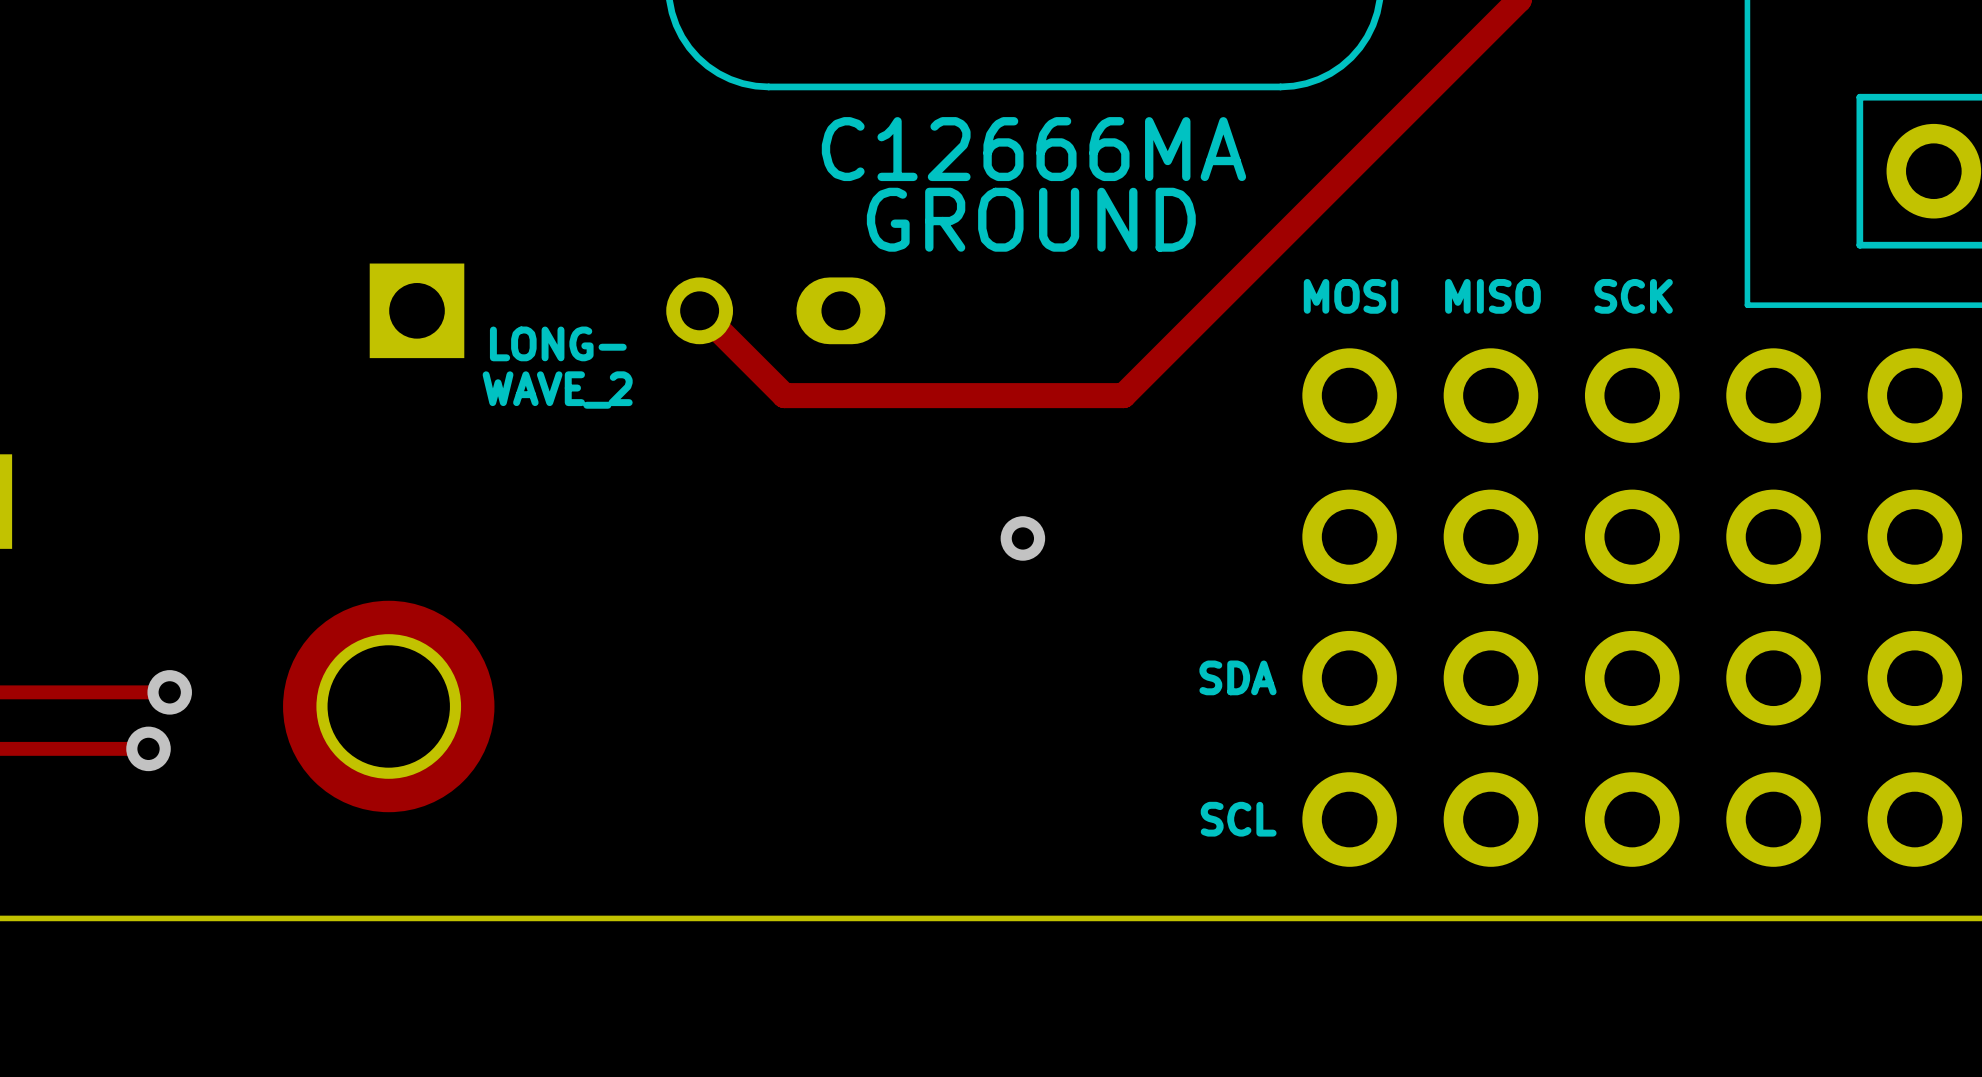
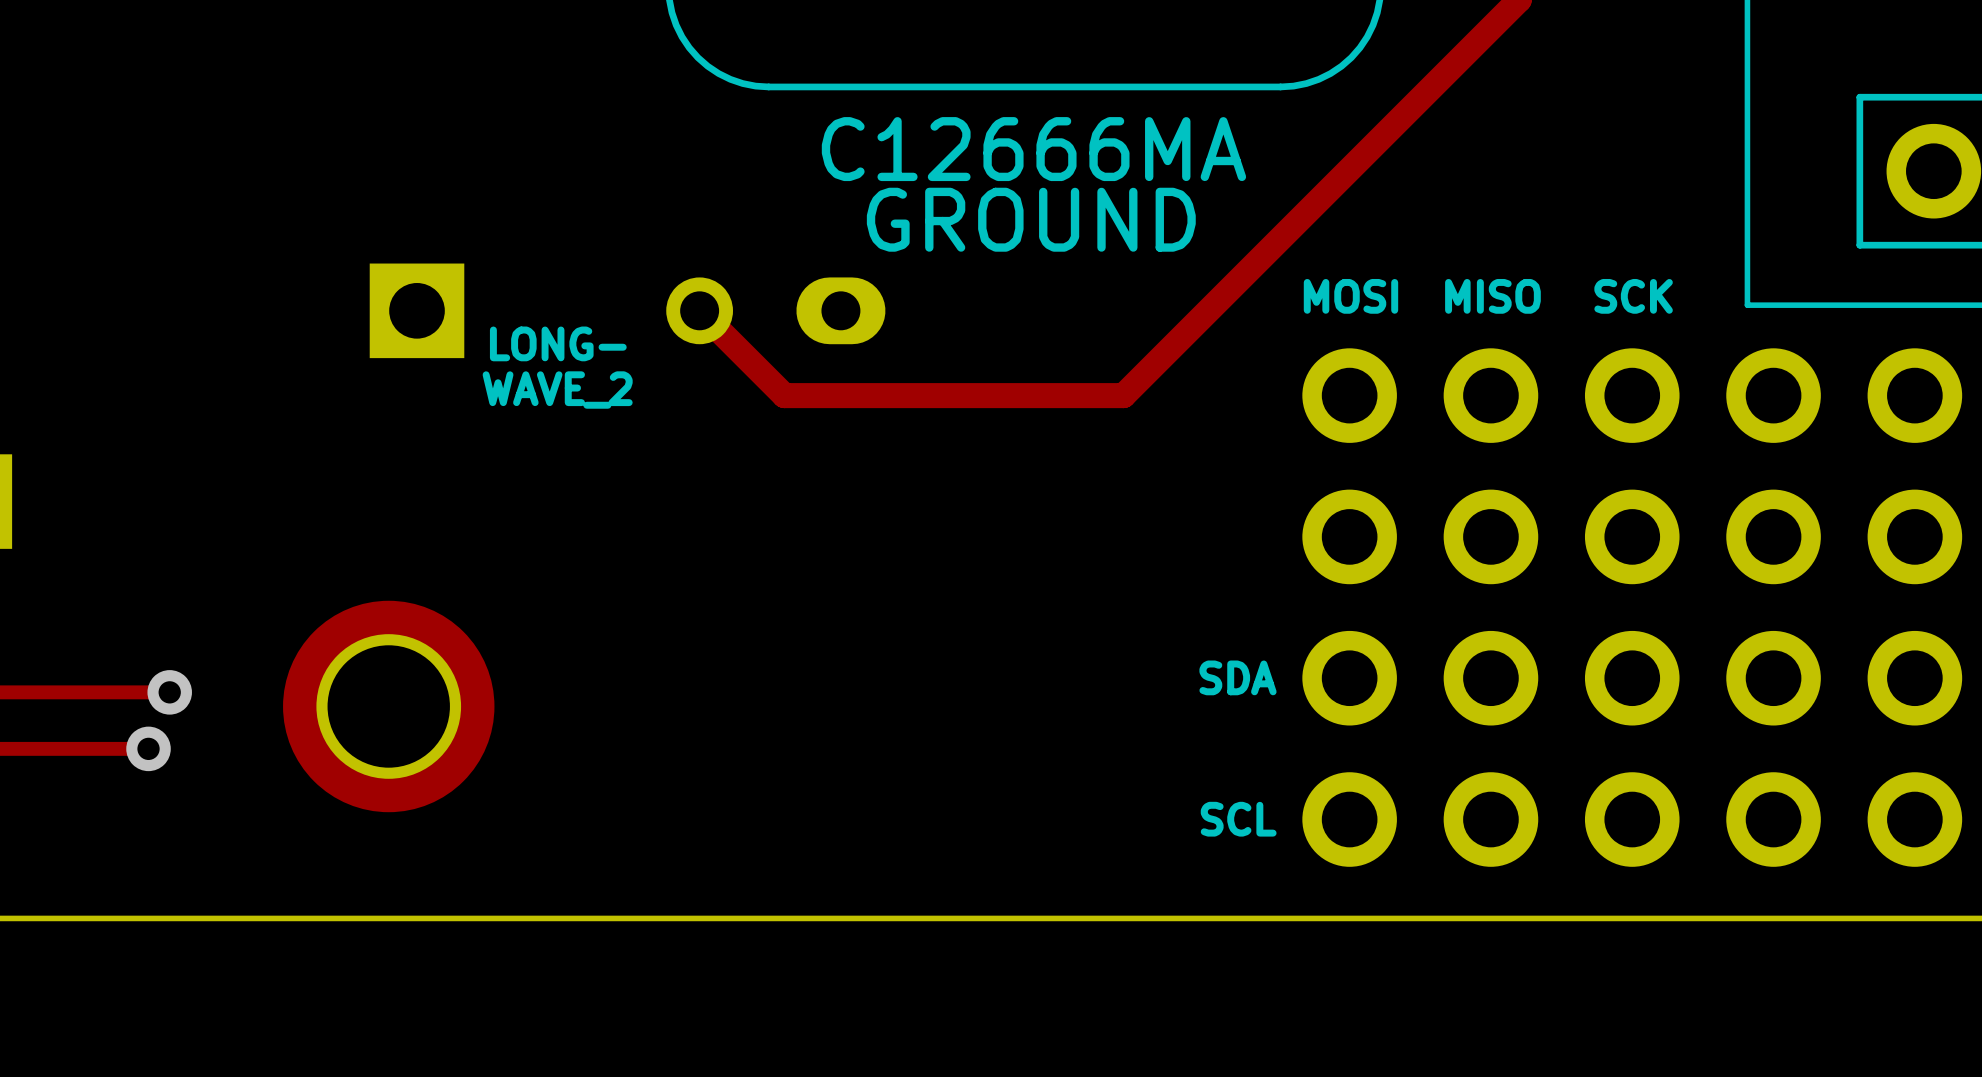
via: (1022, 538) -> none

